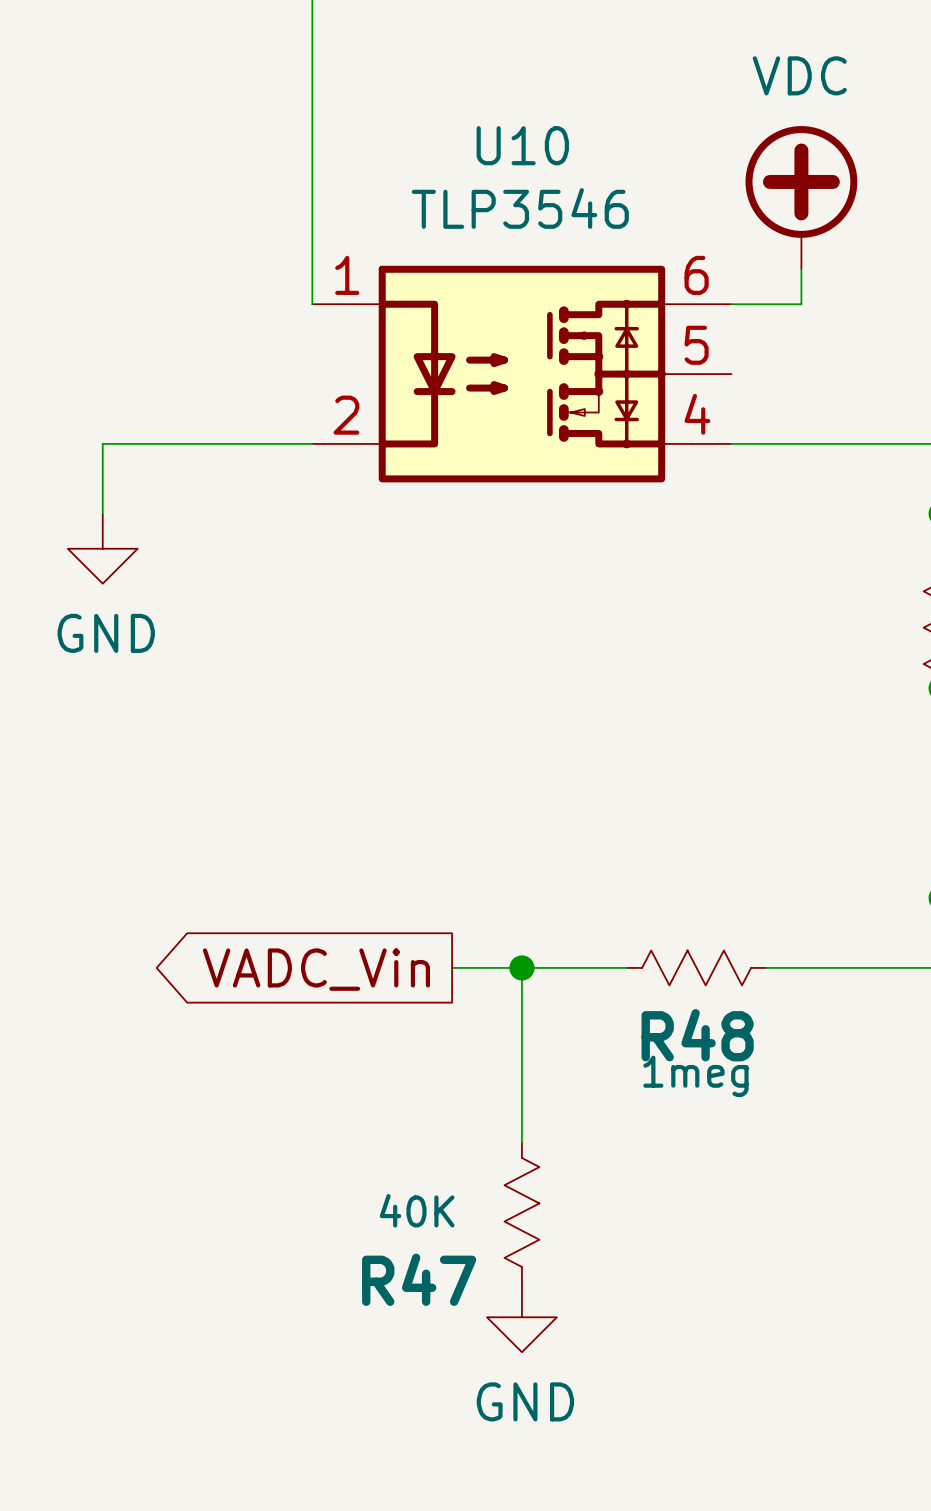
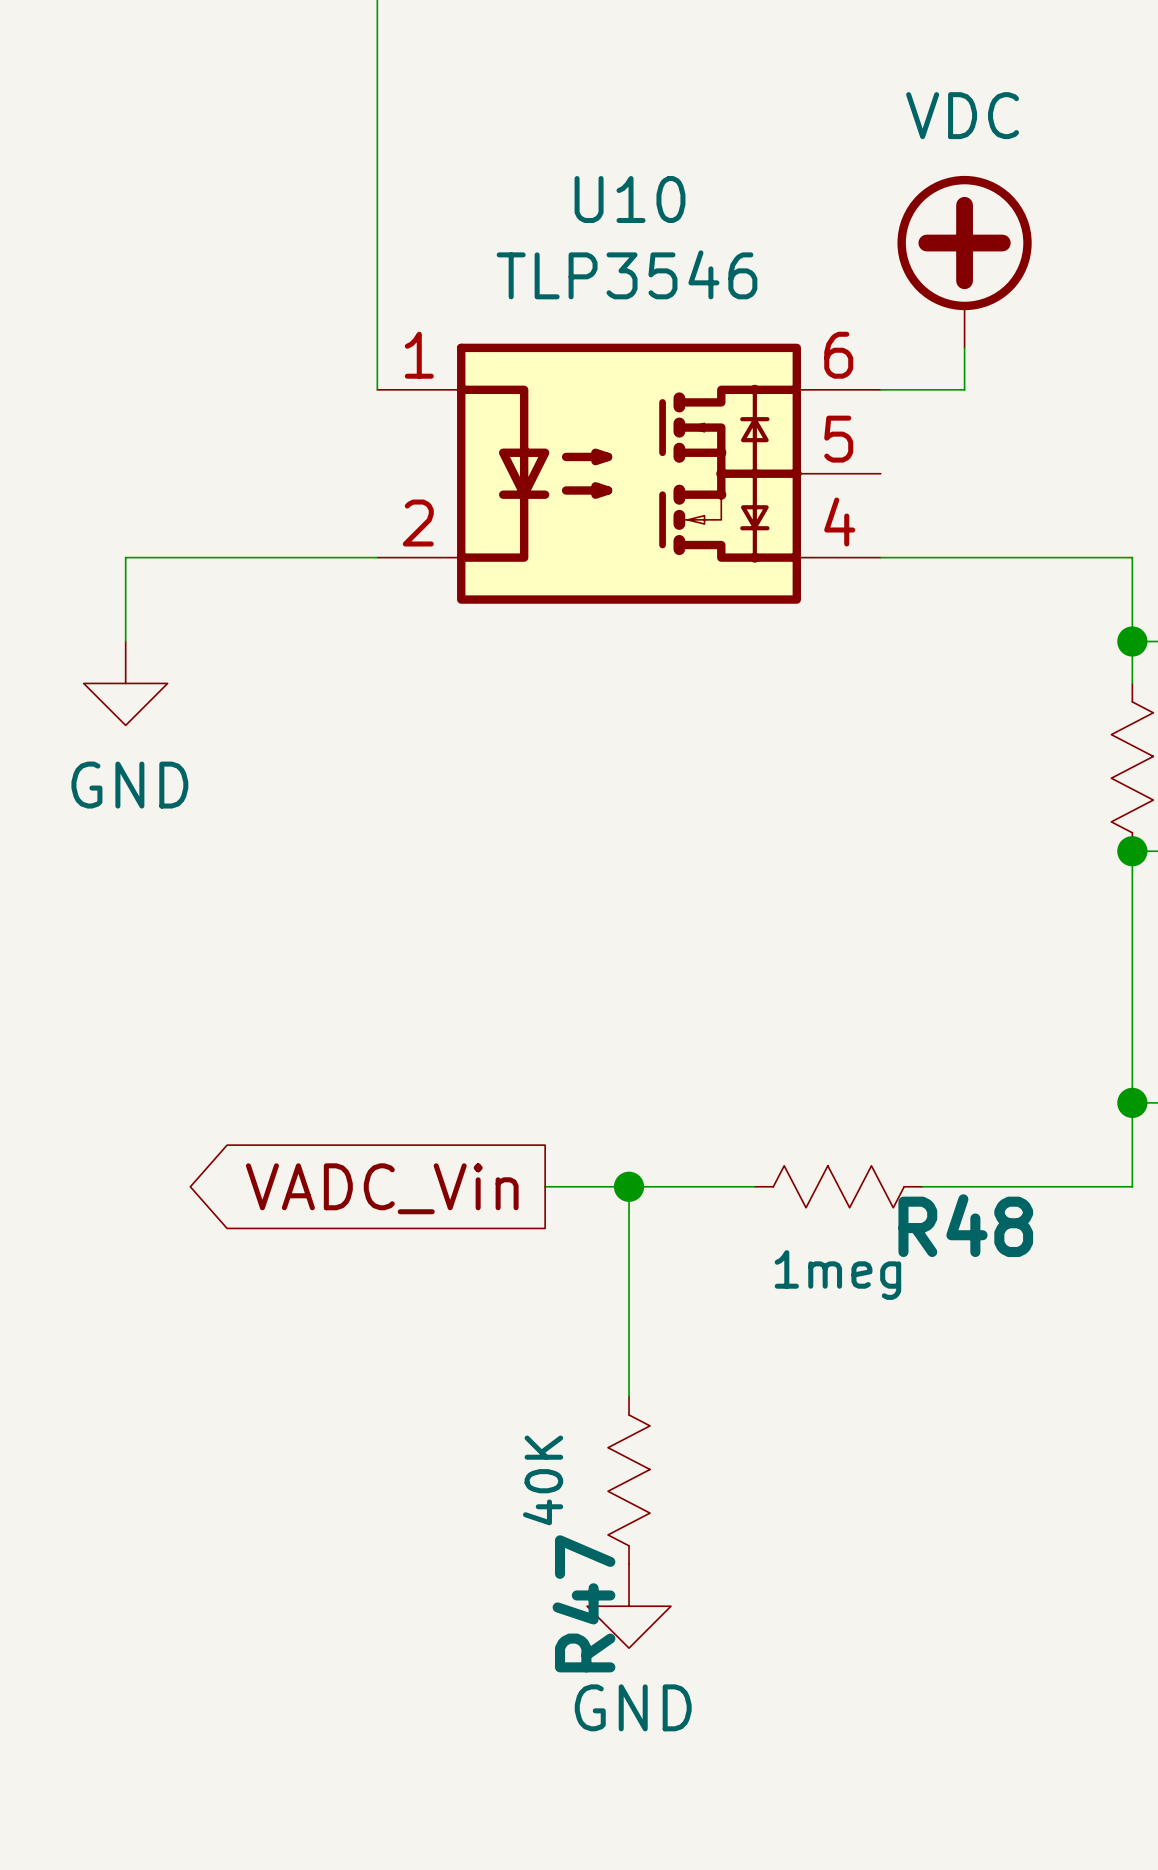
R48 name position: R48 (697, 1035) -> R48 (965, 1225)
R48 value position: 1meg (695, 1076) -> 1meg (837, 1275)
R47 value rotation: 0° (417, 1210) -> 90° counterclockwise (543, 1480)
R47 name rotation: 0° (419, 1279) -> 90° counterclockwise (583, 1603)

